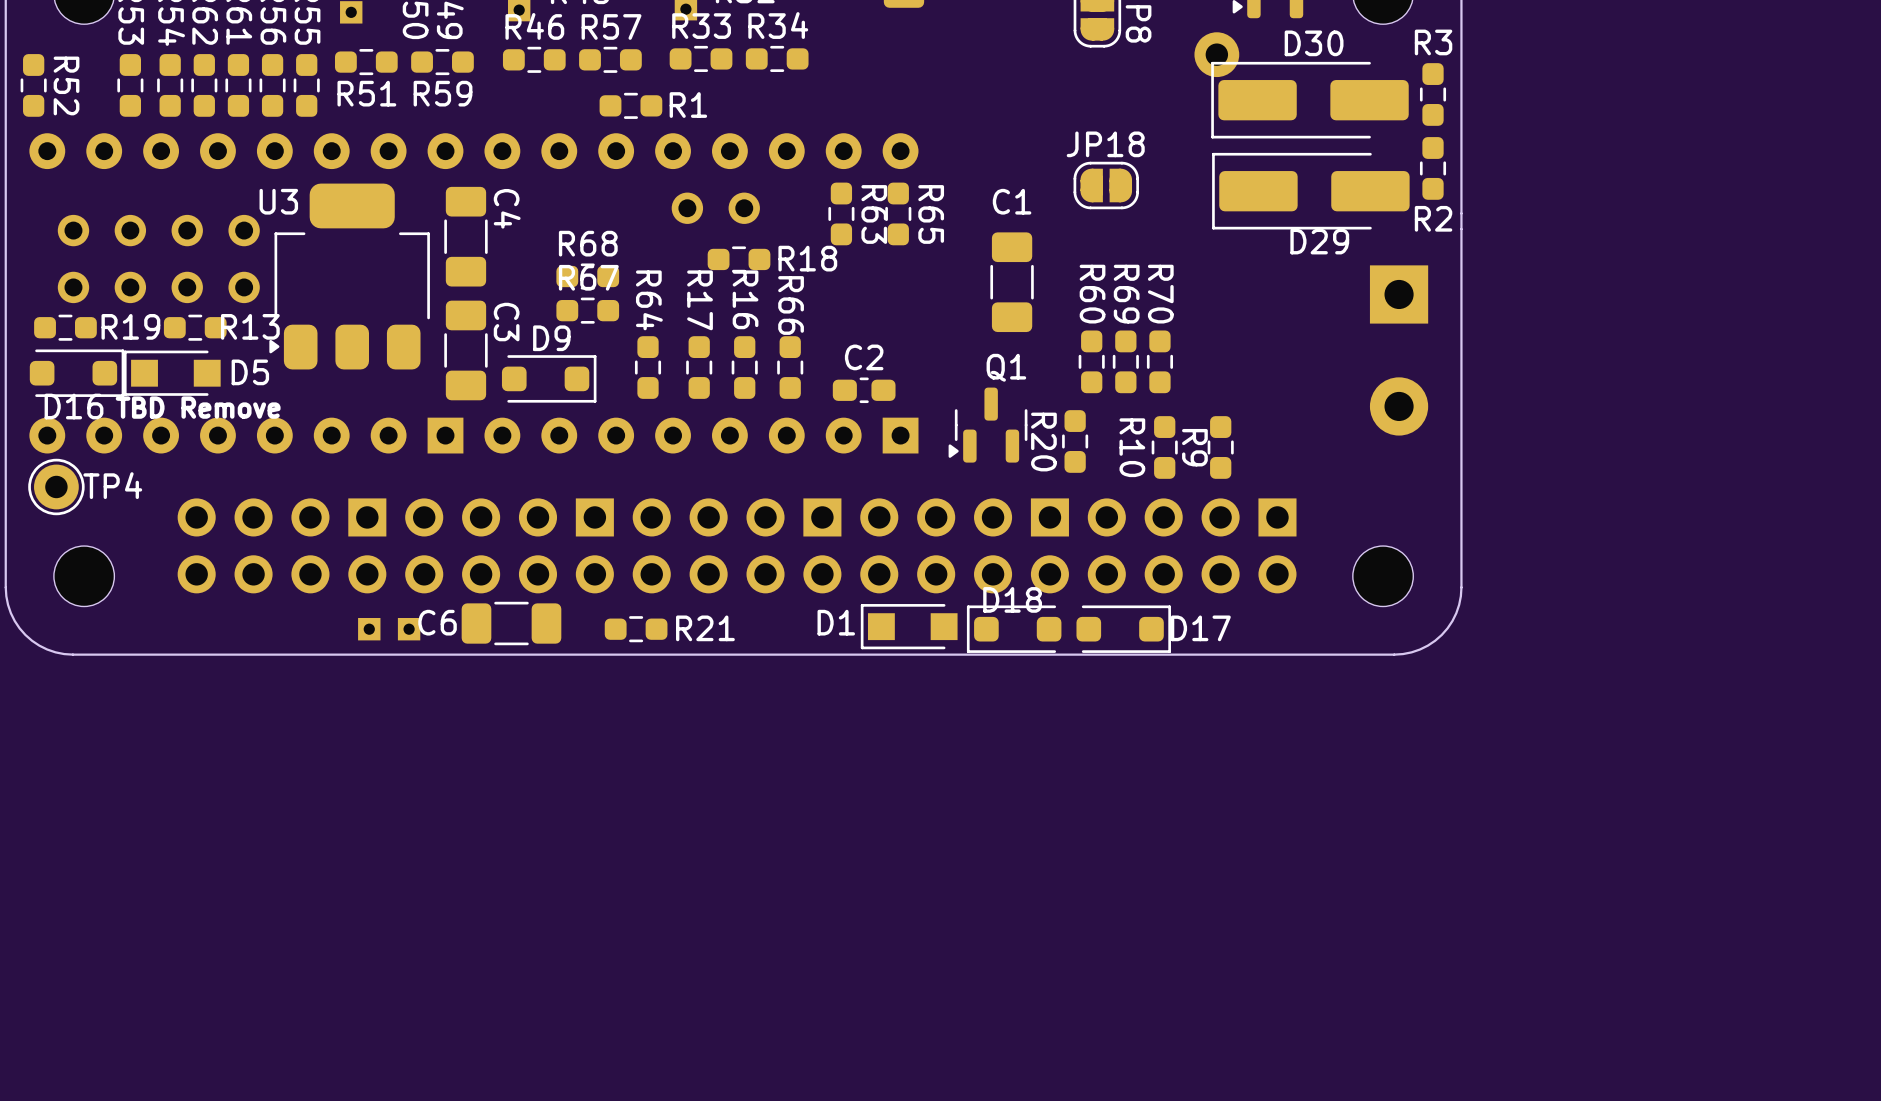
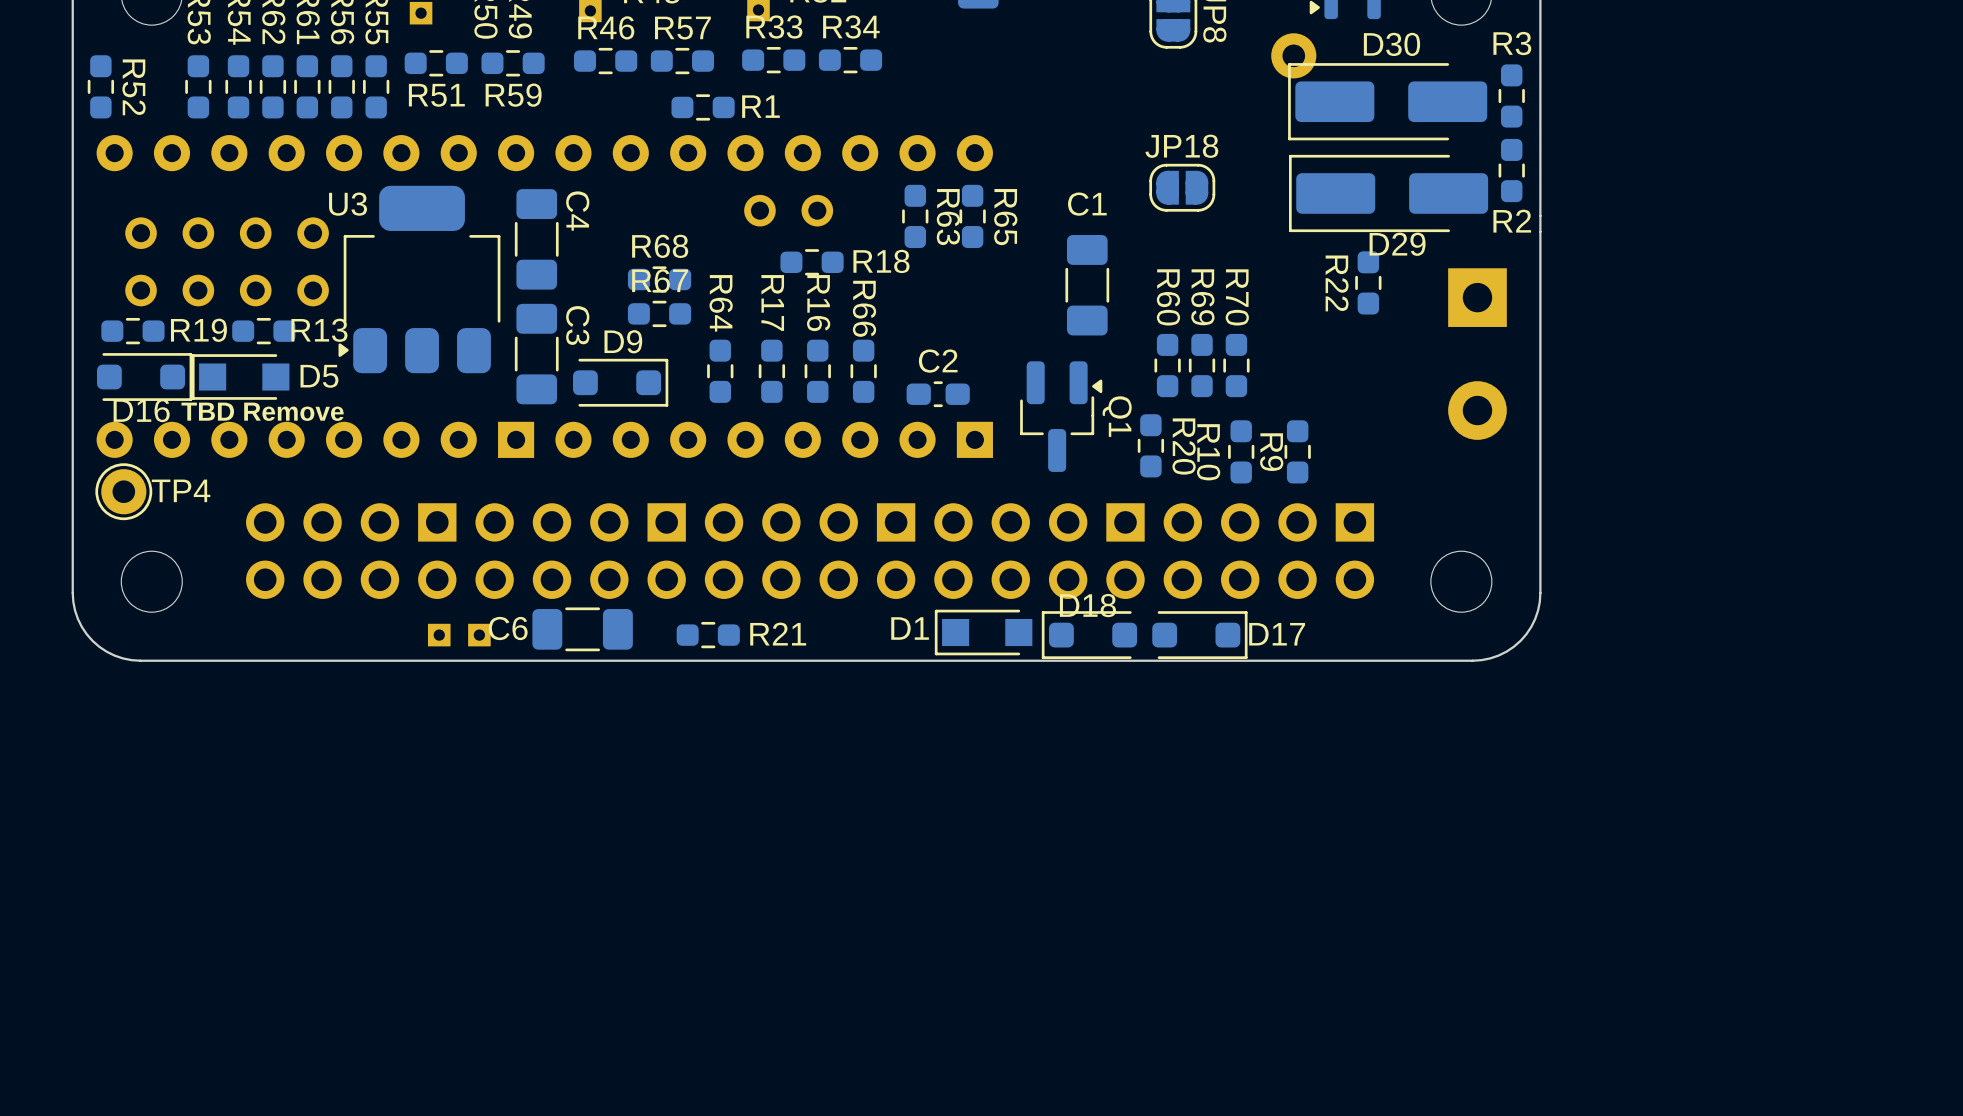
R22: none -> (1368, 282)
Q1 name position: Q1 (1006, 367) -> Q1 (1117, 416)
Q1 footprint: [948, 387, 1028, 463] -> [1020, 361, 1103, 472]
R20 name position: R20 (1043, 442) -> R20 (1184, 446)

